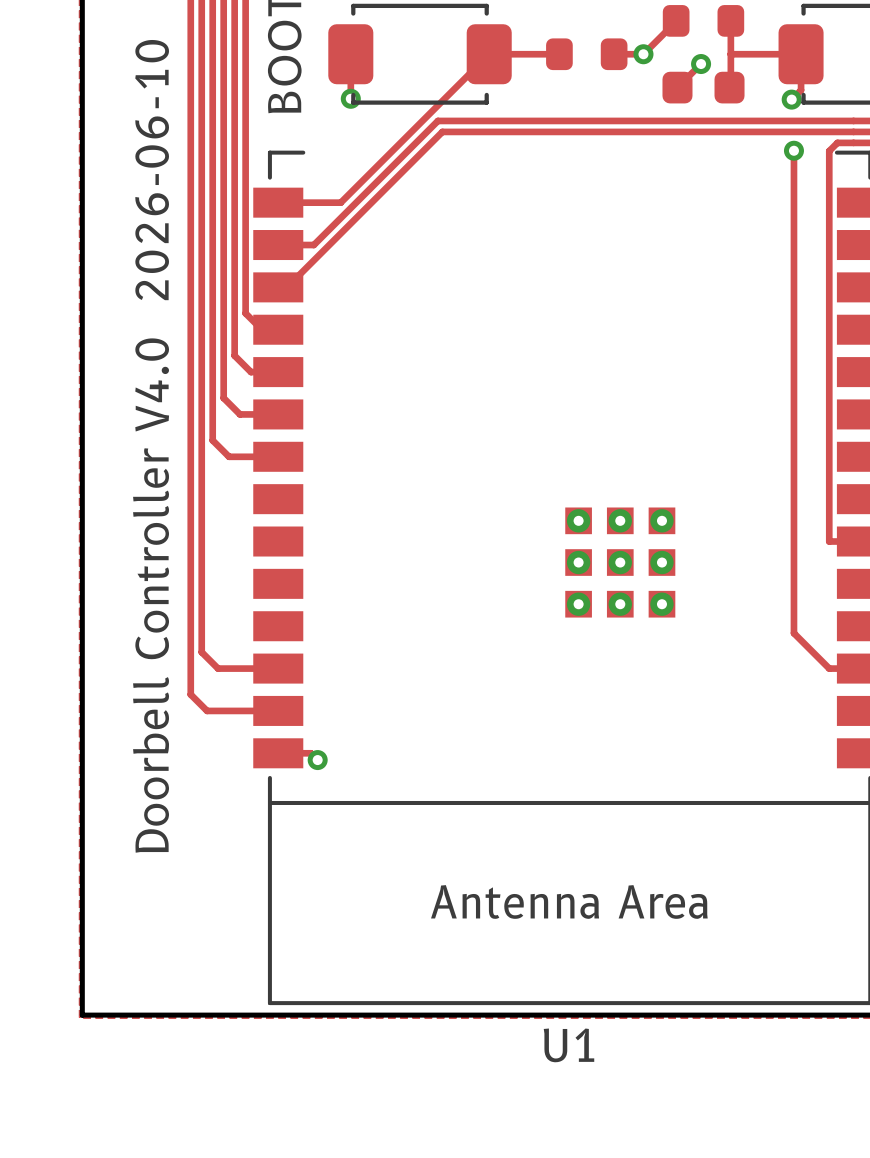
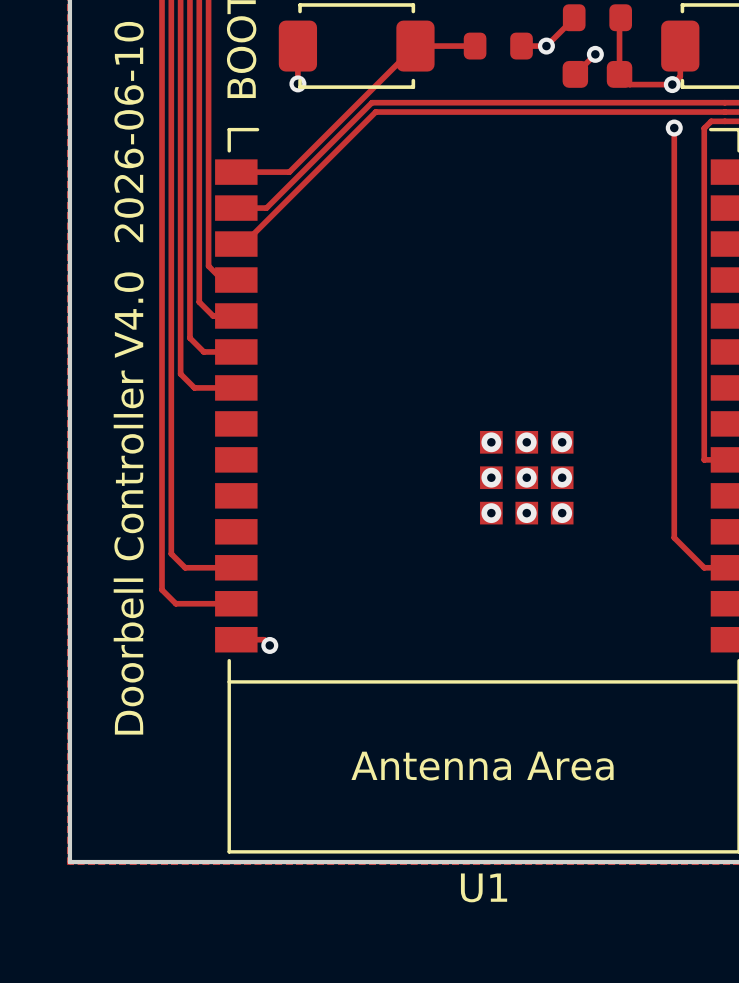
track: (730, 20) (729, 87) -> (620, 17) (619, 74) (629, 84) (672, 84)
track: (730, 54) (801, 54) -> none

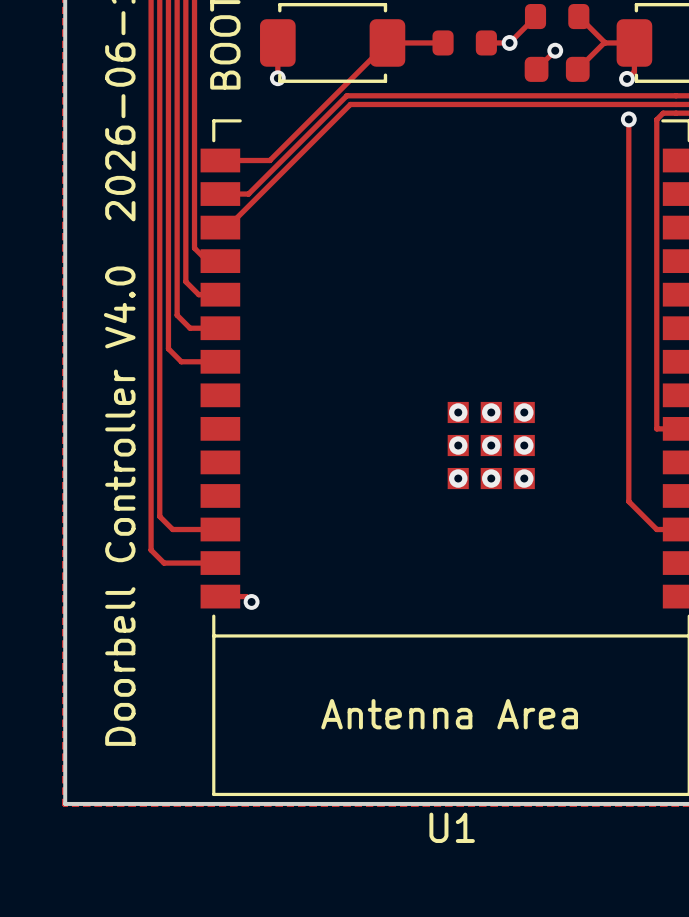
track: (620, 17) (619, 74) (629, 84) (672, 84) -> (578, 16) (605, 42) (634, 42)
track: none -> (604, 42) (577, 69)

